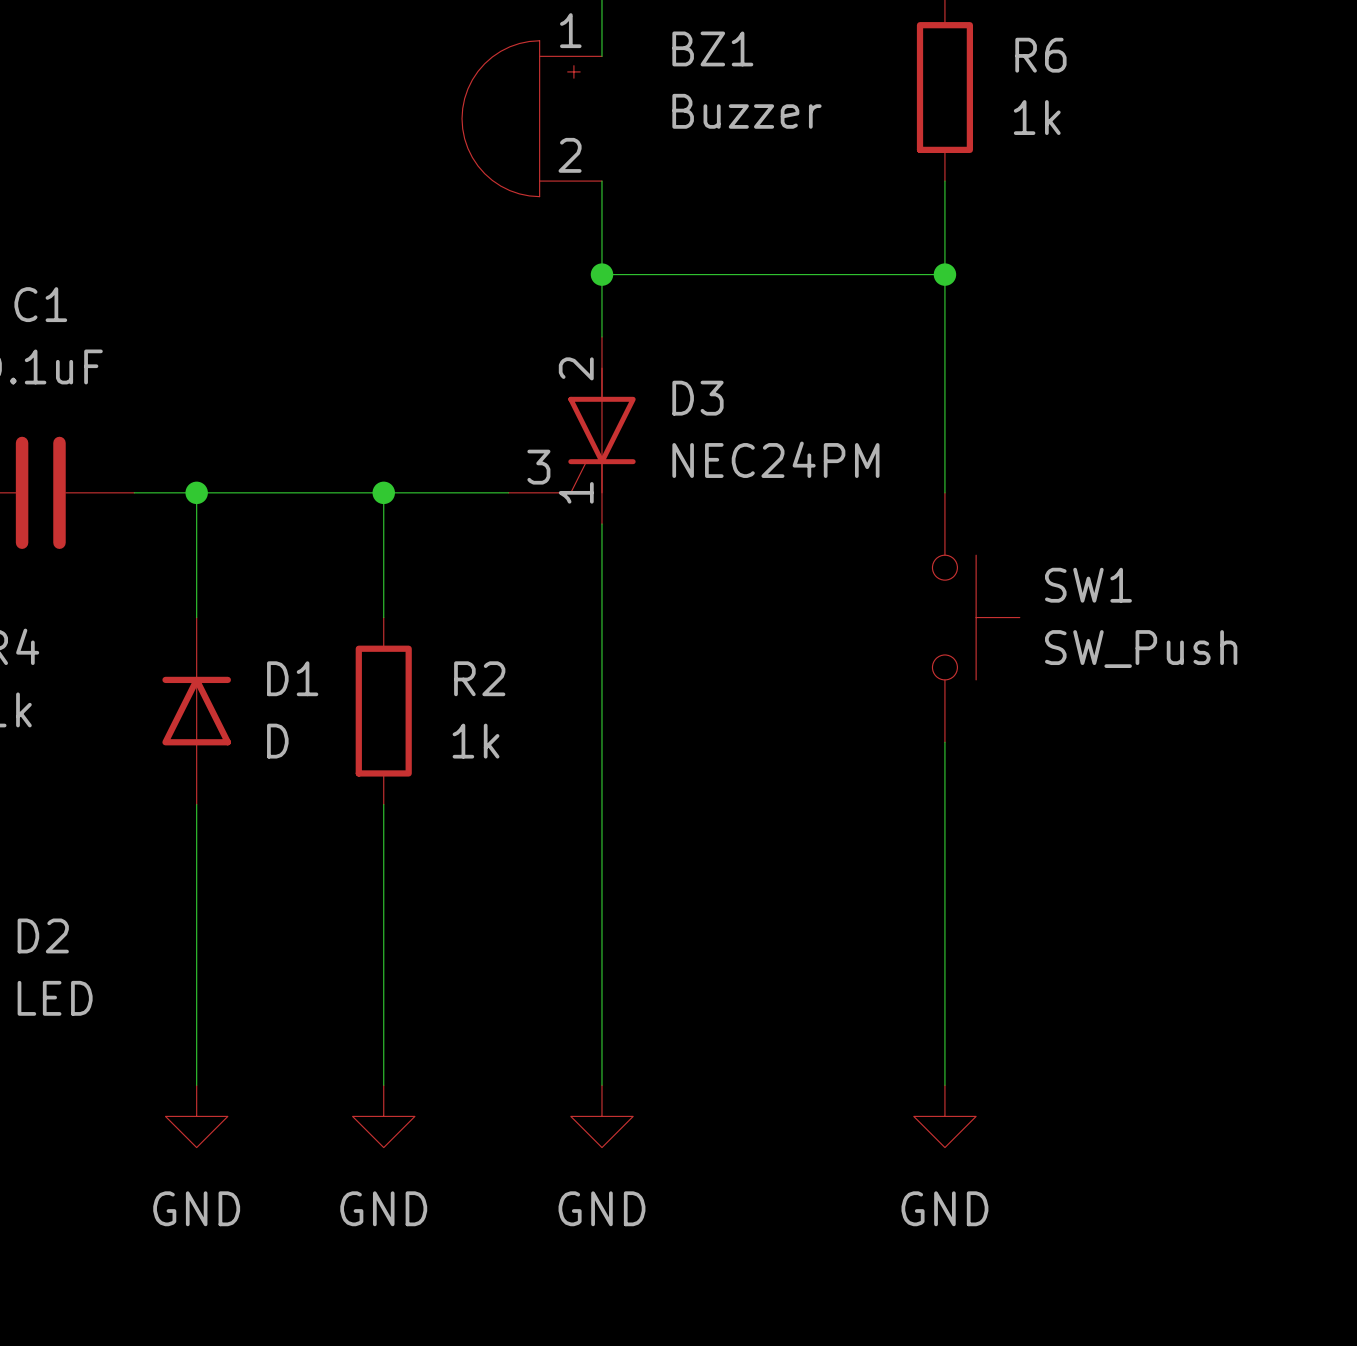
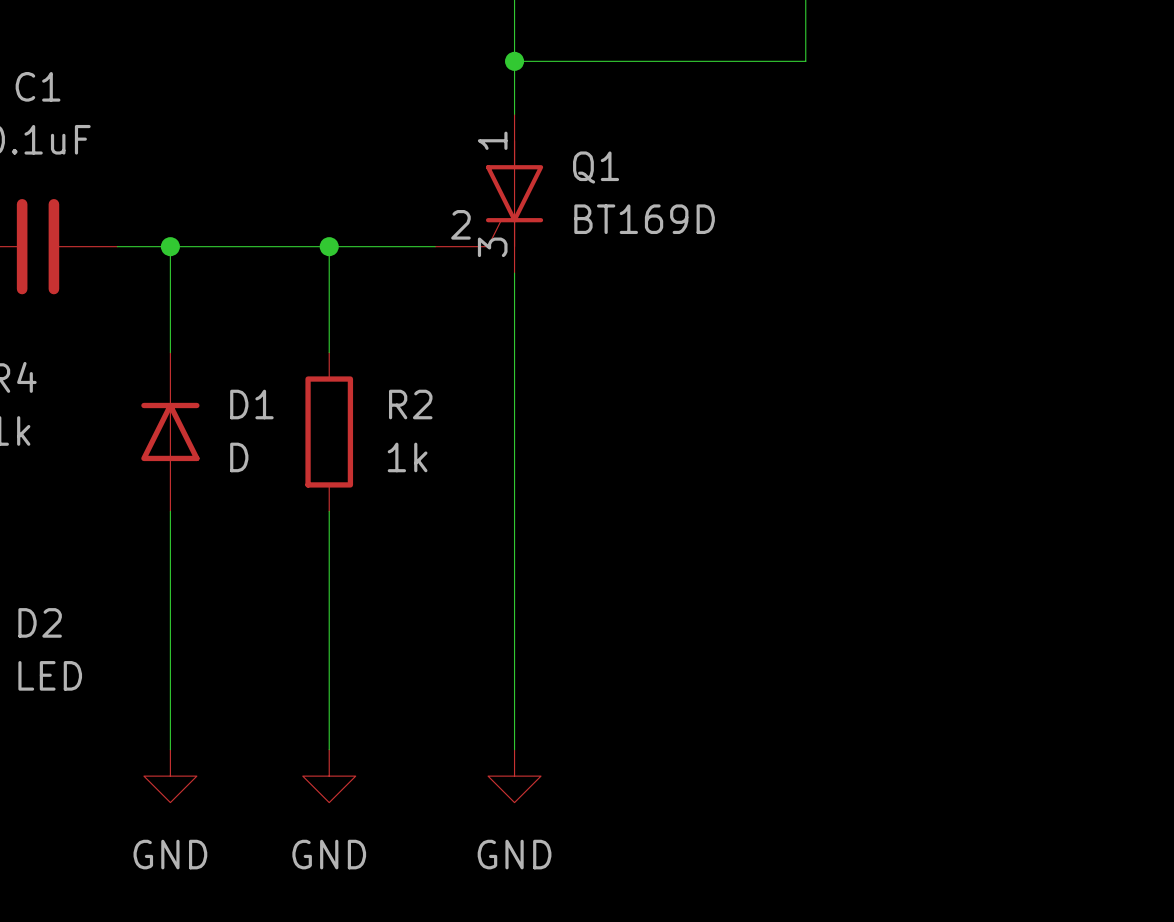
wire: (944, 274) (944, 492) -> none
junction: (944, 274) -> none
D3 pin number: 2 (576, 368) -> 1 (492, 140)
D3 name: D3 (697, 398) -> Q1 (596, 167)
D3 value: NEC24PM (775, 459) -> BT169D (644, 219)
D3 pin number: 3 (538, 467) -> 2 (460, 224)
D3 pin number: 1 (576, 492) -> 3 (492, 247)
SW1: SW_Push (976, 617) -> none
wire: (944, 742) (944, 1085) -> none
power symbol: GND (944, 1116) -> none

